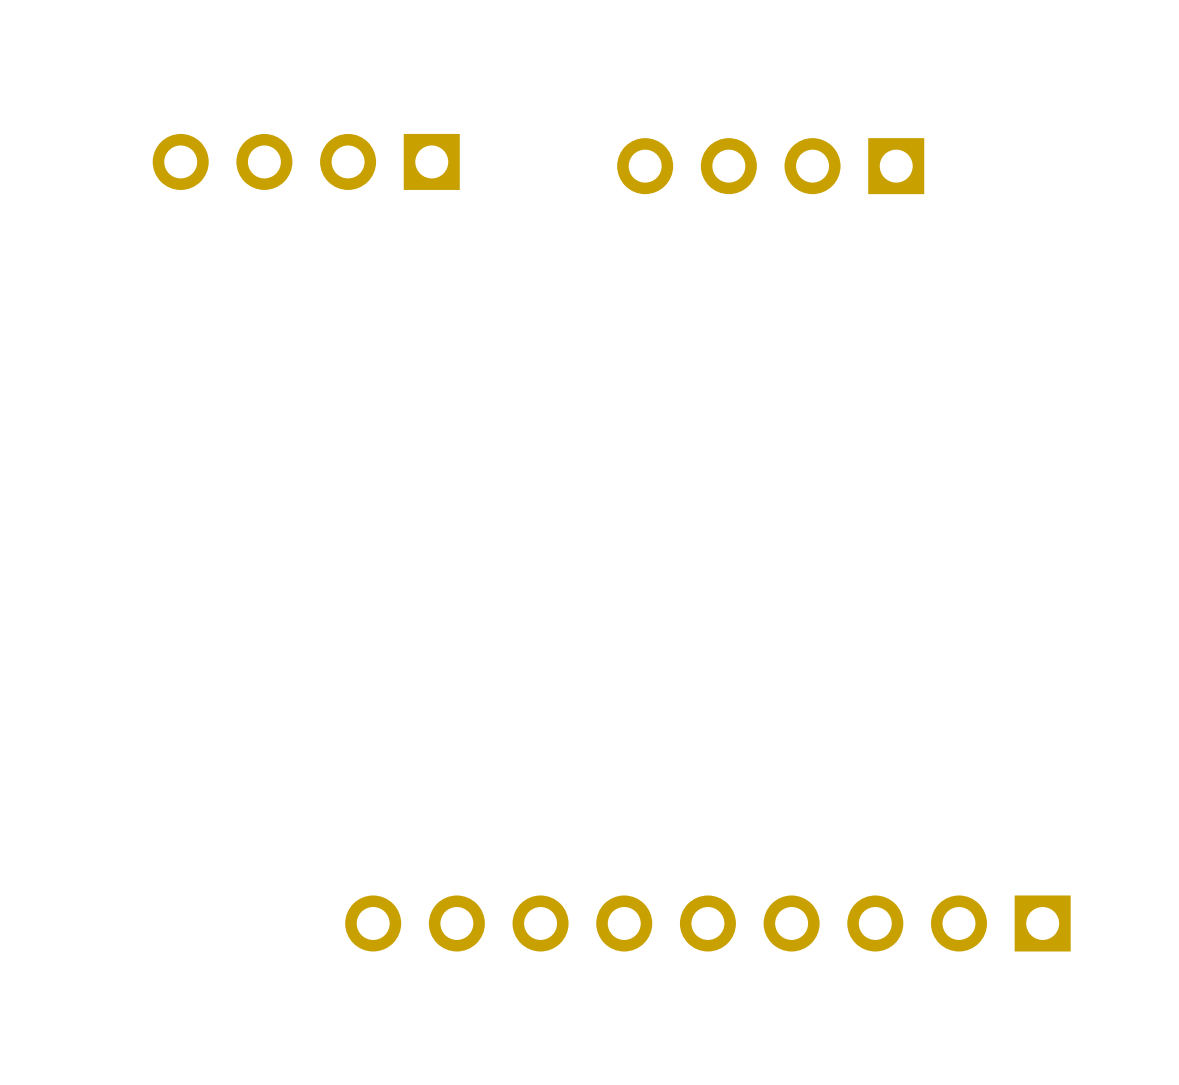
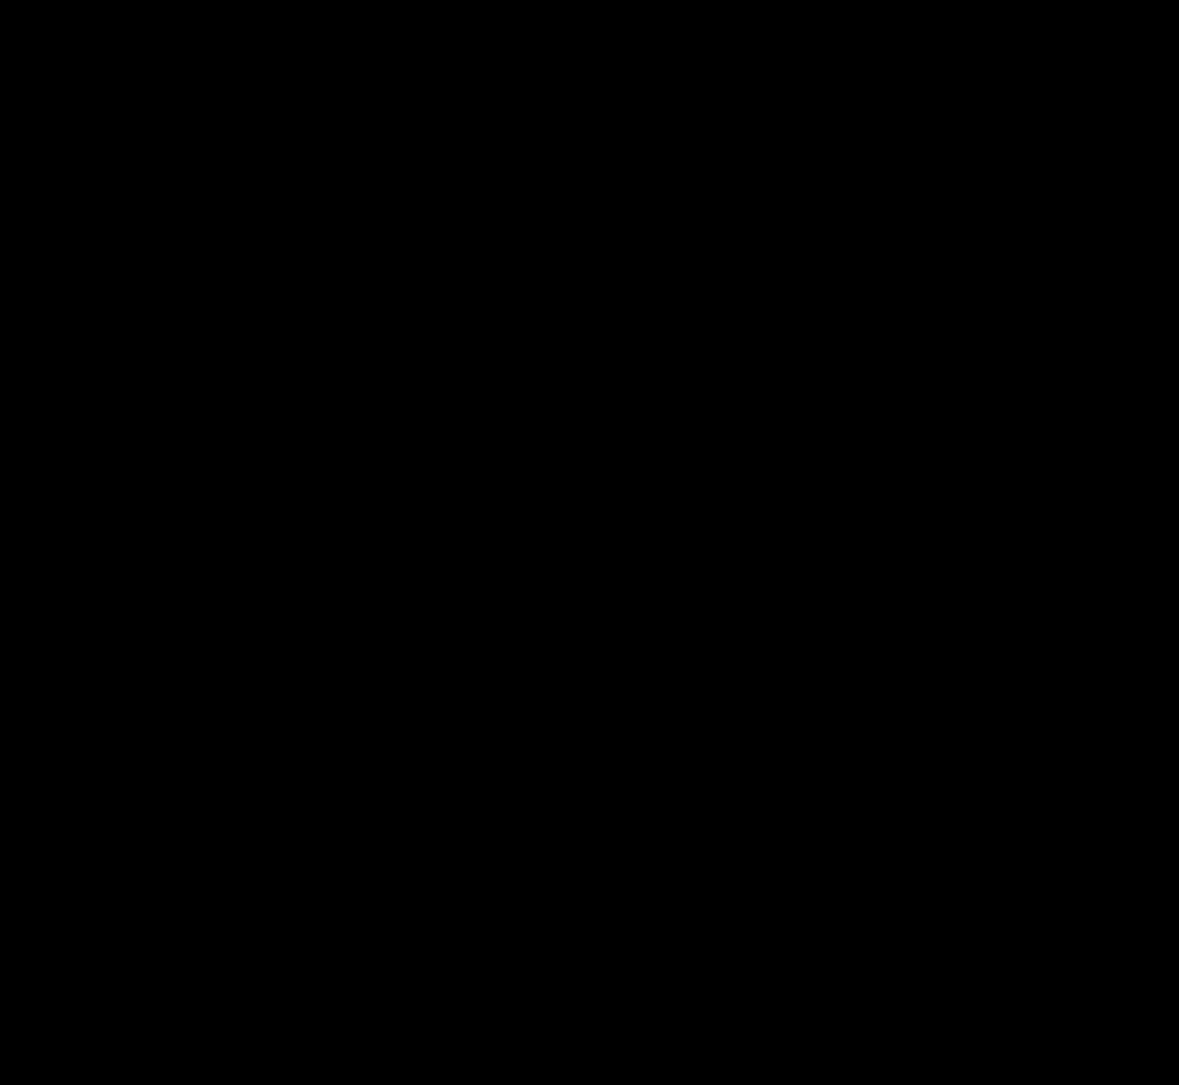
part: (306, 161) -> none
part: (770, 166) -> none
part: (707, 923) -> none

